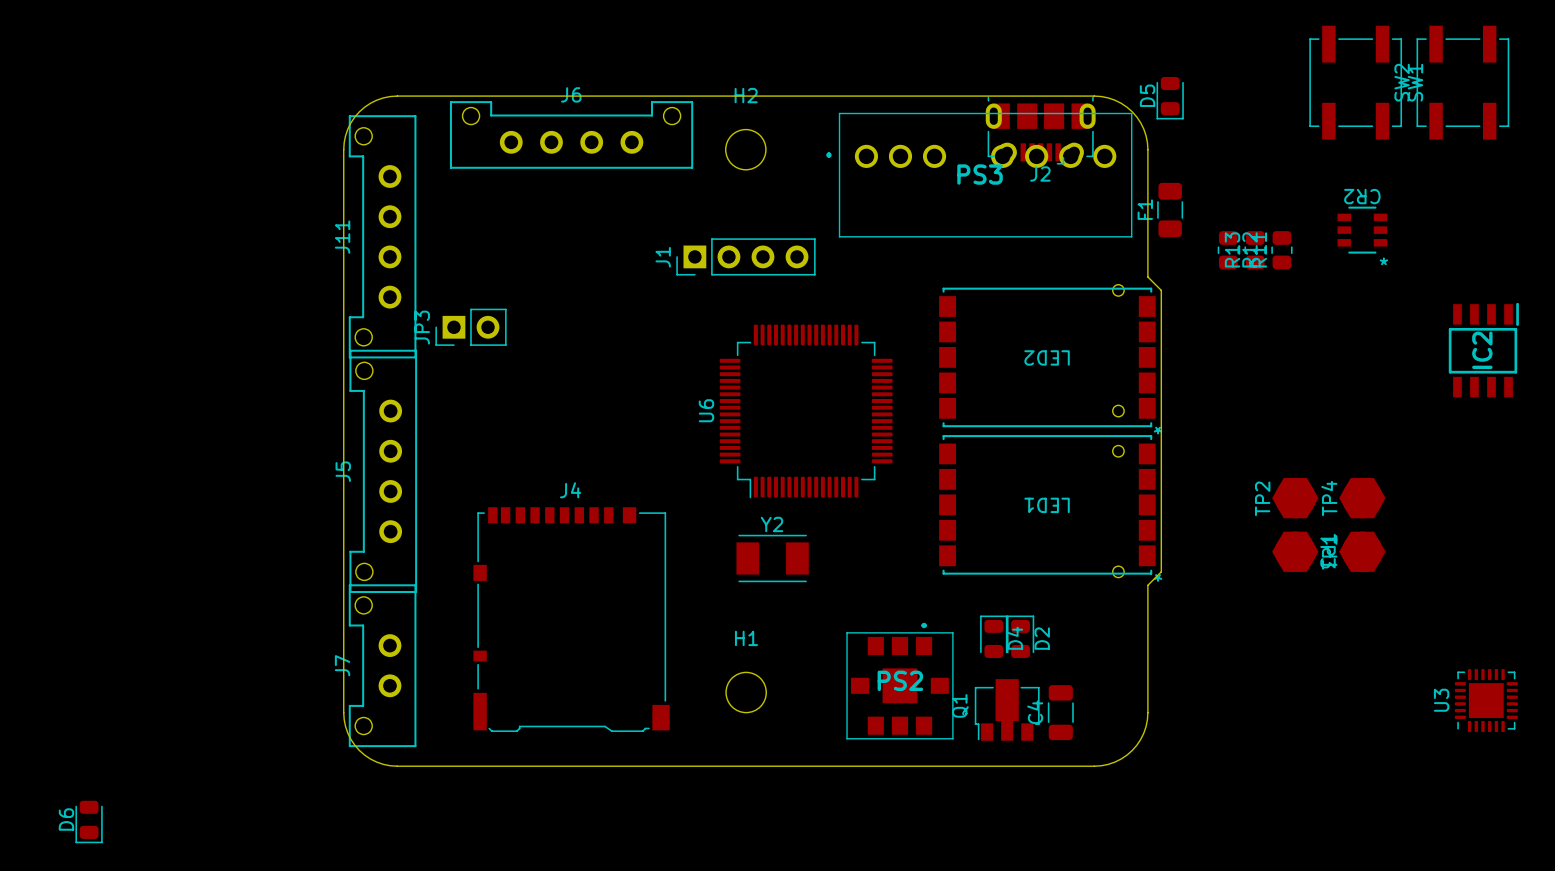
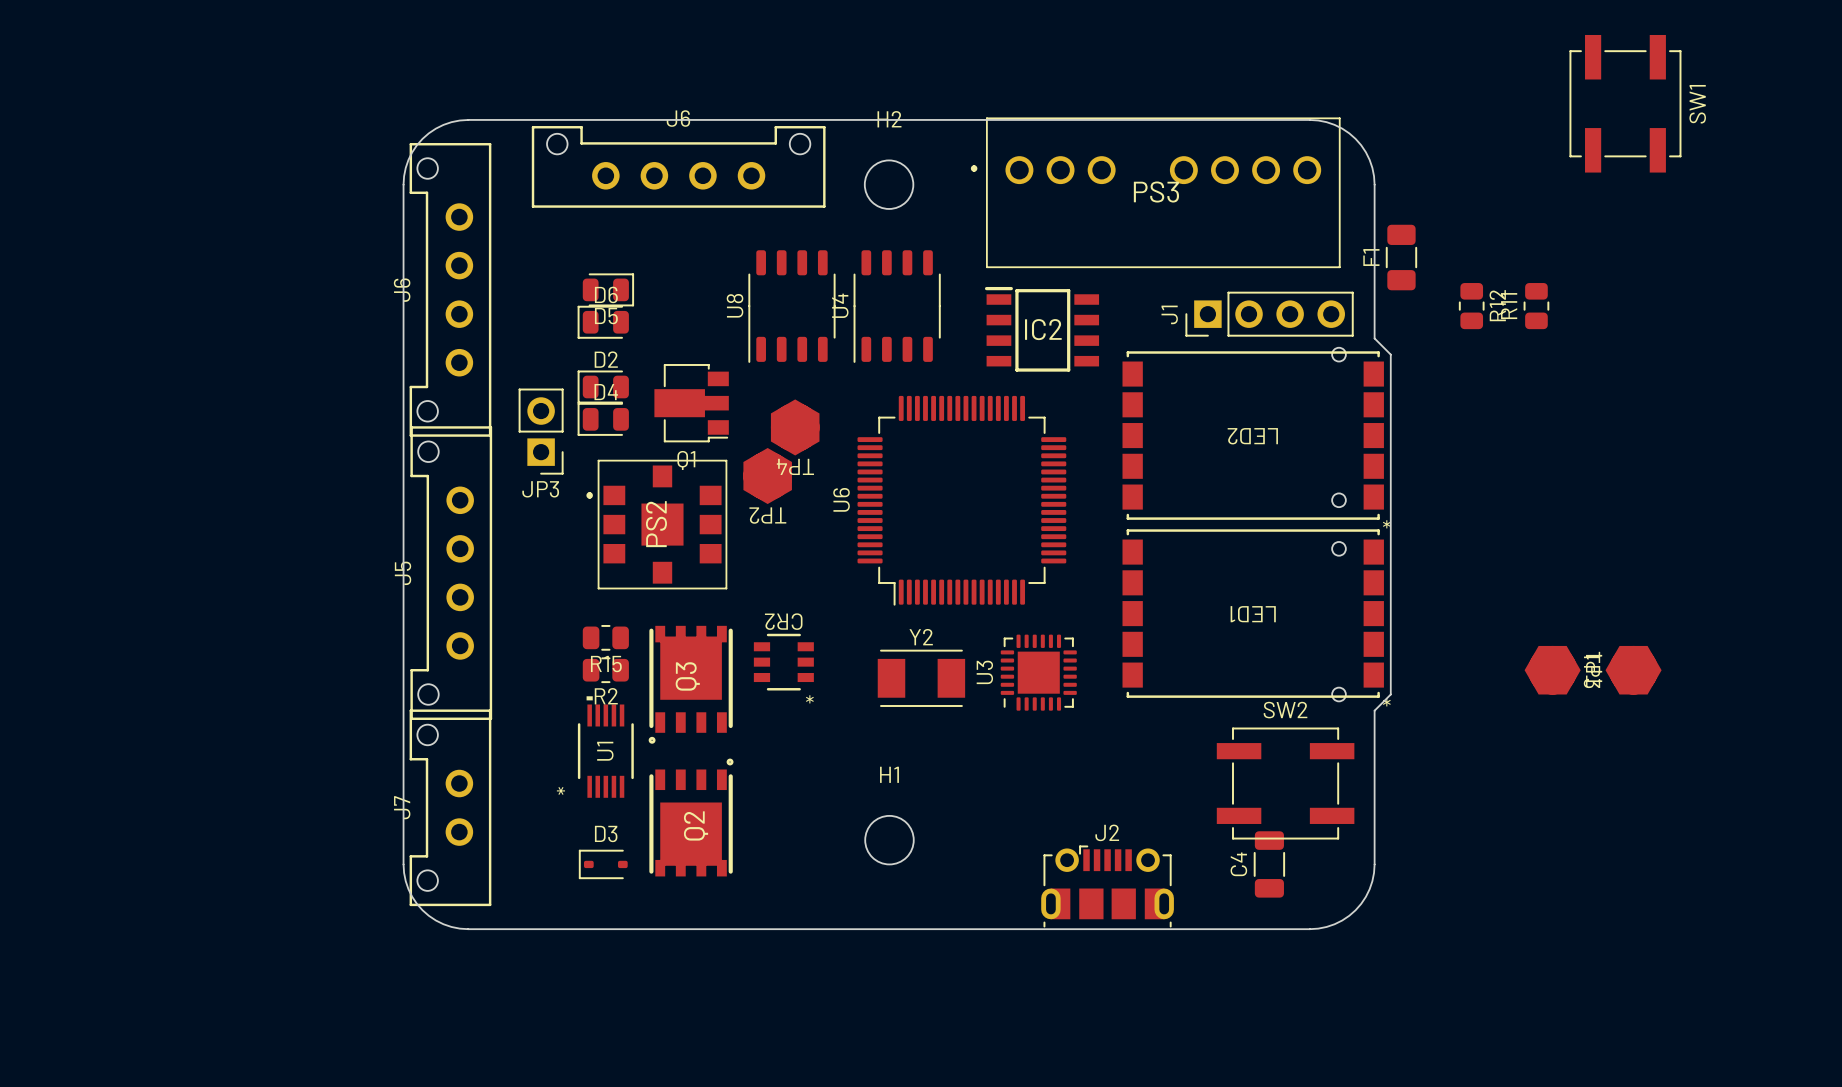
SW2 rotation: 0° (1462, 82) -> 90° clockwise (1285, 783)
SW2 position: (1462, 82) -> (1285, 783)
D5 rotation: 0° (1170, 98) -> 90° counterclockwise (608, 289)
D5 position: (1170, 98) -> (608, 289)
J2 rotation: 0° (1040, 130) -> 180° (1107, 886)
J2 position: (1040, 130) -> (1107, 886)
PS3 position: (979, 175) -> (1155, 192)
CR2 position: (1362, 230) -> (783, 662)
J11 name: J11 (342, 237) -> J6 (402, 290)
U8: none -> (791, 306)
U4: none -> (897, 306)
R13: (1255, 250) -> none
J1 position: (745, 256) -> (1269, 314)
JP3 rotation: 0° (470, 327) -> 90° counterclockwise (541, 431)
IC2 rotation: 0° (1483, 350) -> 90° counterclockwise (1042, 329)
IC2 position: (1483, 350) -> (1042, 329)
TP2 name position: TP2 (1262, 498) -> TP2 (767, 515)
TP2 rotation: 0° (1295, 498) -> 90° clockwise (767, 476)
TP2 position: (1295, 498) -> (767, 476)
TP4 name position: TP4 (1329, 498) -> TP4 (795, 466)
TP4 rotation: 0° (1362, 498) -> 90° clockwise (795, 427)
TP4 position: (1362, 498) -> (795, 427)
R15: none -> (605, 637)
R2: none -> (605, 670)
Q3: none -> (690, 684)
U1: none -> (605, 747)
J4: (571, 619) -> none
D4 rotation: 0° (993, 636) -> 90° counterclockwise (603, 419)
D4 position: (993, 636) -> (603, 419)
D2 rotation: 0° (1020, 636) -> 90° counterclockwise (603, 387)
D2 position: (1020, 636) -> (603, 387)
Q2: none -> (691, 817)
PS2 rotation: 0° (899, 681) -> 90° counterclockwise (656, 524)
PS2 position: (899, 681) -> (656, 524)
U3 position: (1486, 700) -> (1038, 672)
Q1 rotation: 0° (1007, 709) -> 90° counterclockwise (691, 403)
Q1 position: (1007, 709) -> (691, 403)
D3: none -> (603, 864)
D6 rotation: 0° (89, 821) -> 90° clockwise (603, 322)
D6 position: (89, 821) -> (603, 322)

